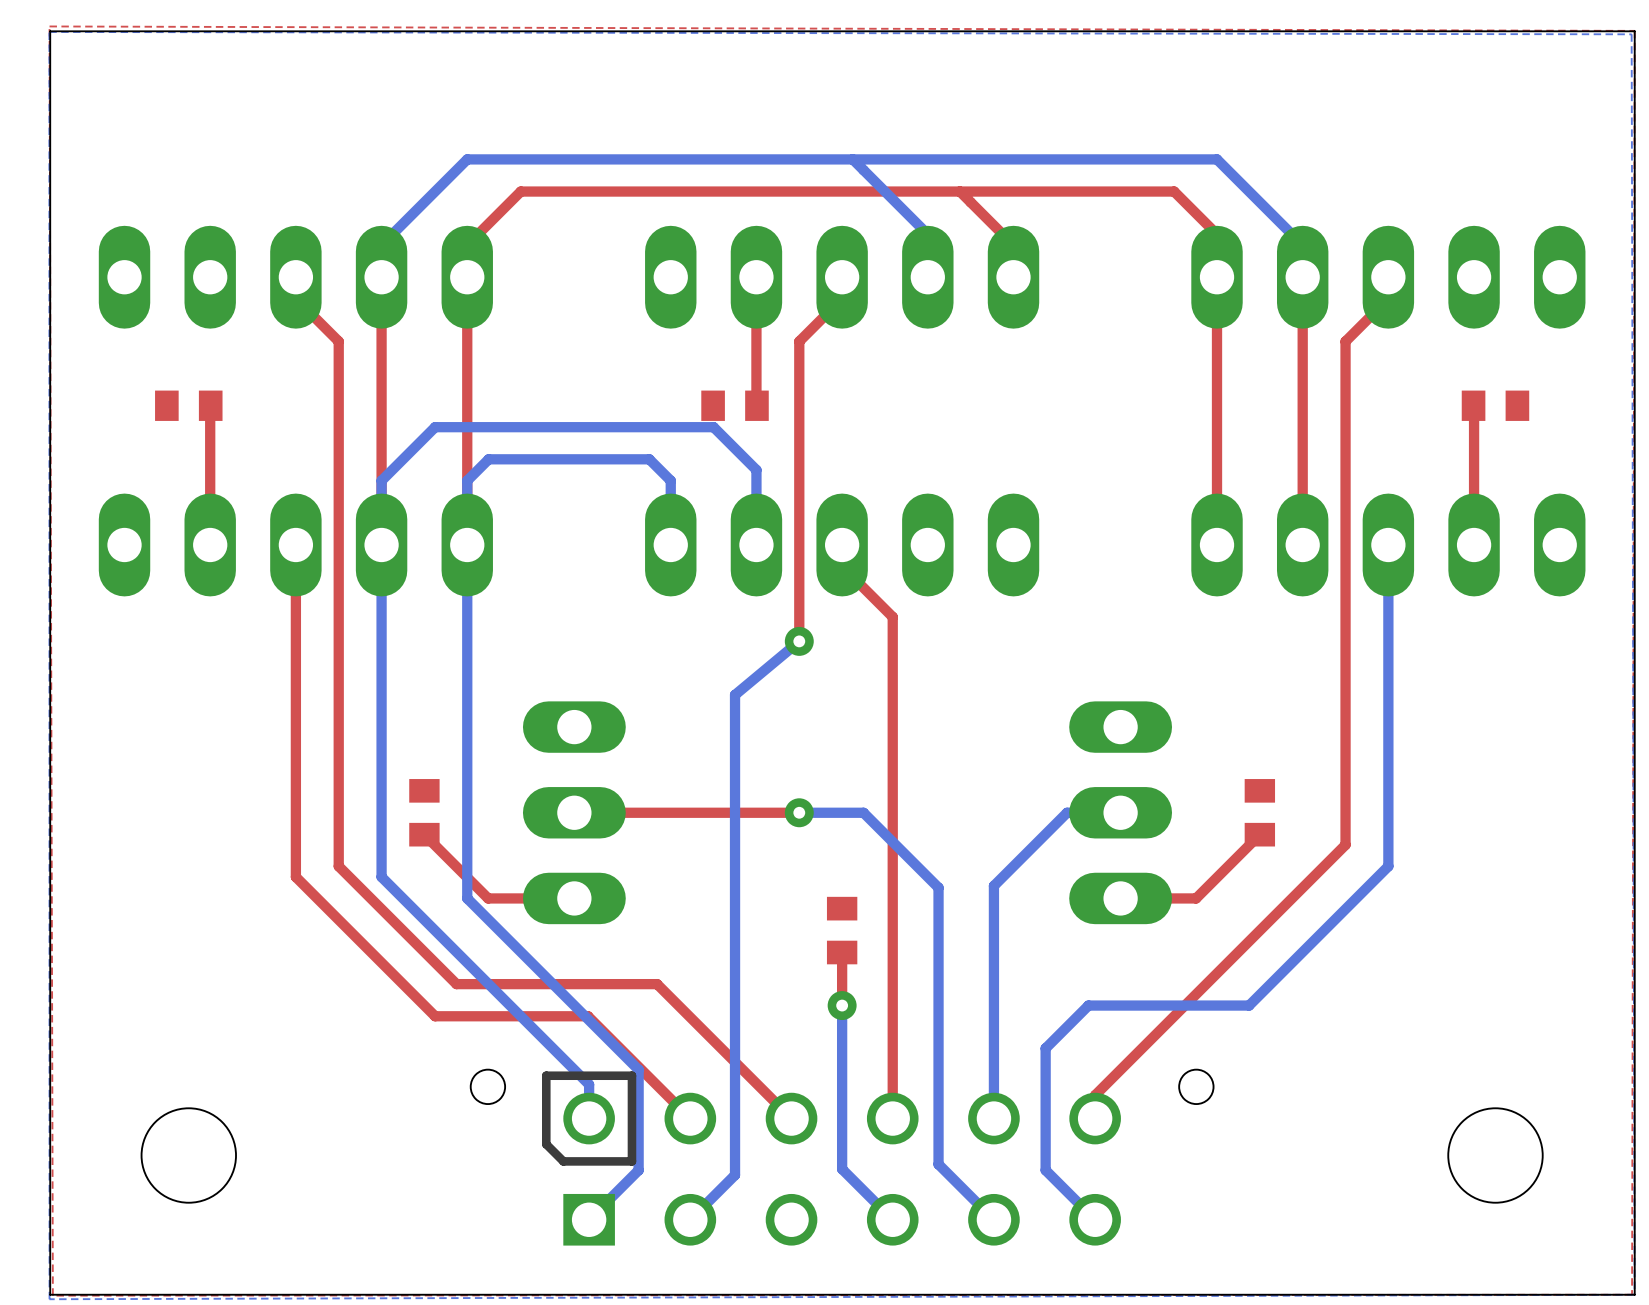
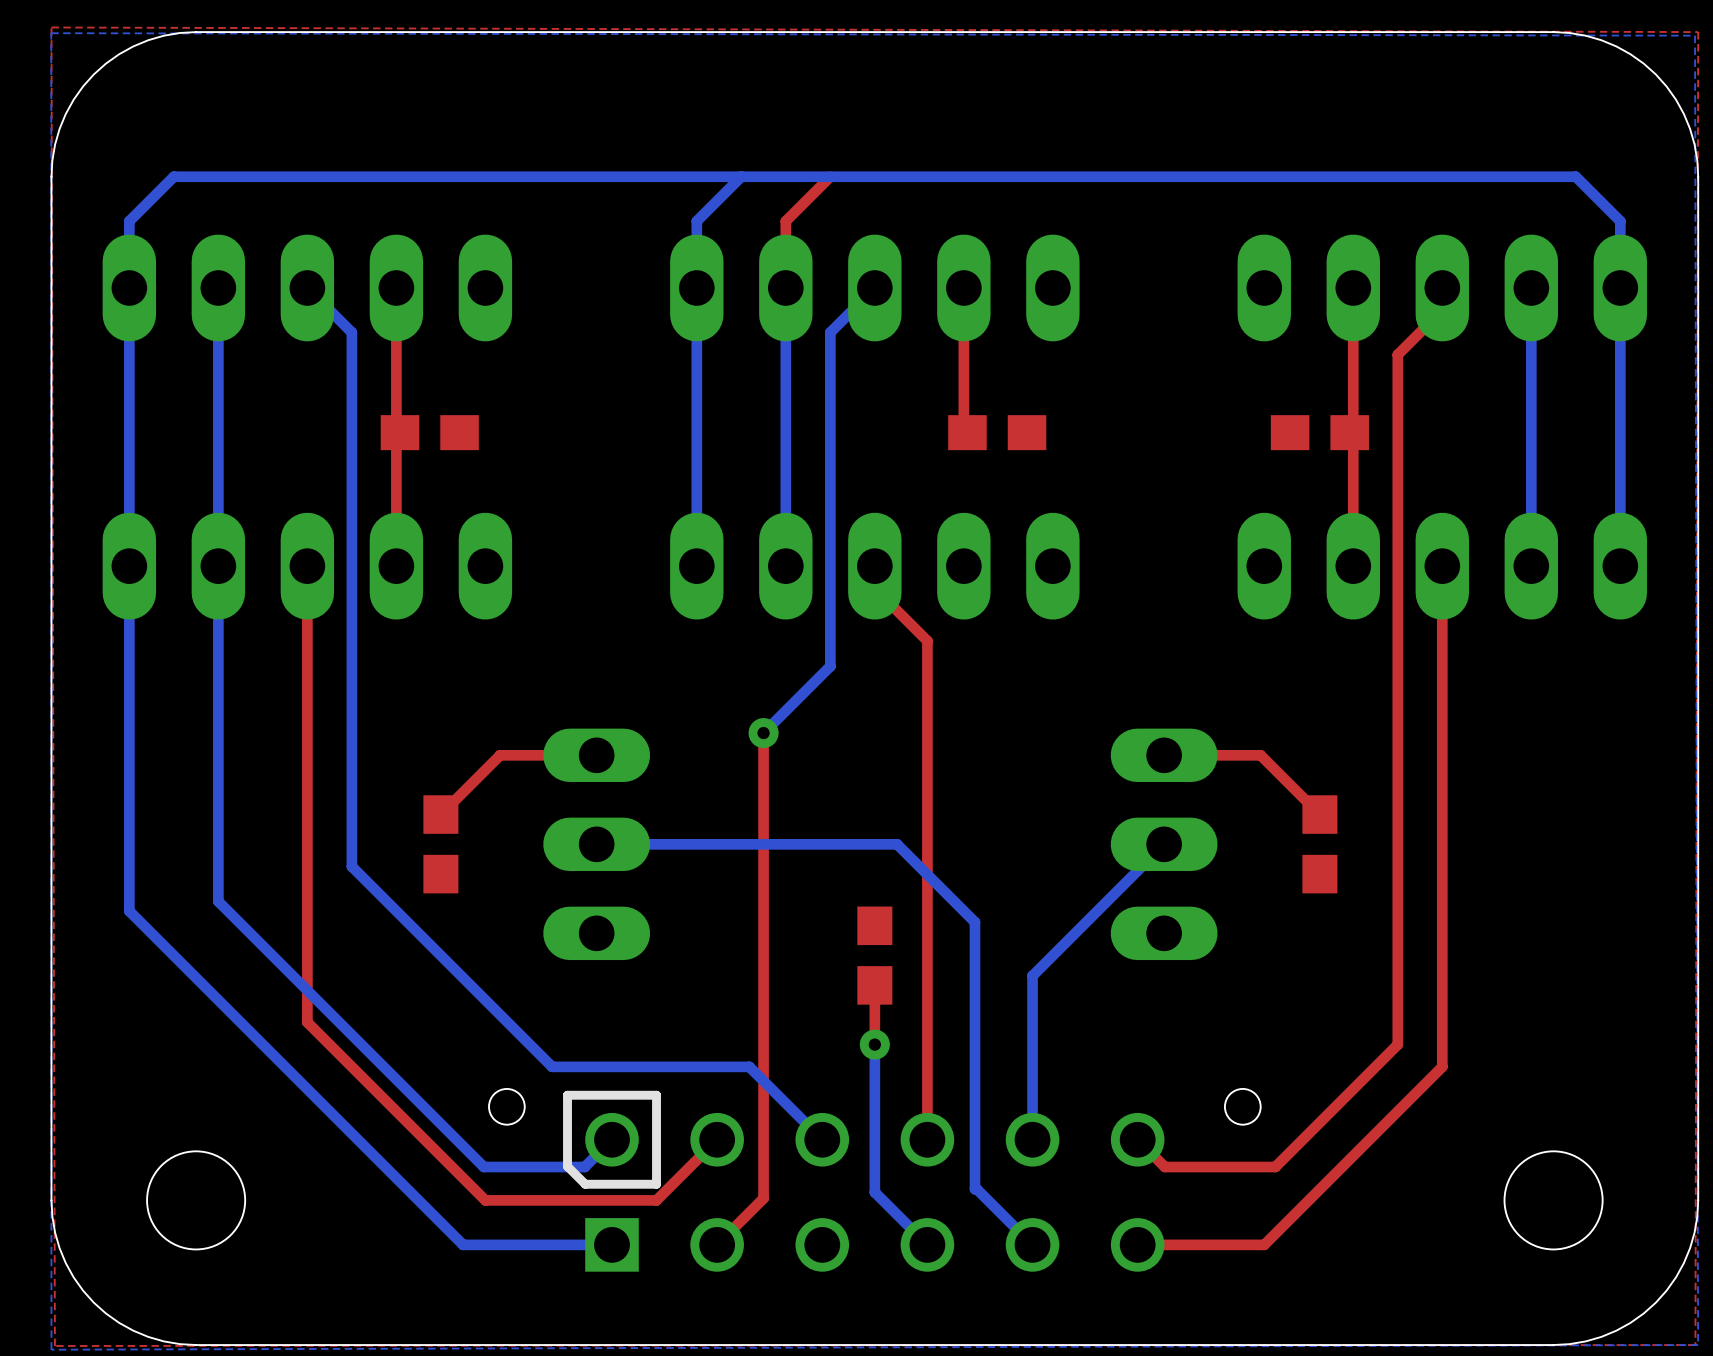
bottom track: (852, 159) (927, 234) (927, 277) -> none
board edge: (1634, 170) (1634, 31) (50, 31) (50, 1294) (188, 1294) -> (1698, 176) (1694, 144) (1690, 128) (1676, 99) (1655, 74) (1630, 54) (1616, 46) (1601, 40) (1569, 32) (196, 32) (163, 35) (148, 40) (119, 54) (105, 63) (83, 86) (65, 113) (55, 144) (51, 176) (52, 1216) (59, 1248) (65, 1263) (73, 1277) (93, 1302) (119, 1322) (148, 1336) (163, 1341) (196, 1345)
top track: (959, 191) (1013, 245) (1013, 277) -> none
bottom track: none -> (218, 287) (218, 901) (483, 1167) (584, 1167) (612, 1139)
top track: (295, 277) (295, 298) (338, 341) (338, 866) (456, 984) (657, 984) (791, 1118) -> none
top track: (756, 277) (756, 405) -> (785, 287) (785, 221) (830, 176)
bottom track: none -> (785, 287) (785, 488)
top track: (842, 277) (842, 298) (799, 341) (799, 641) -> none
bottom track: none -> (874, 287) (830, 332) (830, 666) (763, 733)
top track: none -> (963, 287) (963, 429) (967, 432)
bottom track: (1302, 277) (1302, 245) (1217, 159) (467, 159) (381, 245) (381, 277) -> none
bottom track: none -> (1531, 287) (1531, 566)
part: (188, 405) -> none
top track: (210, 405) (210, 544) -> none
part: (735, 405) -> none
top track: (1473, 405) (1474, 544) -> none
part: (1495, 405) -> none
part: none -> (429, 432)
part: none -> (997, 432)
part: none -> (1319, 432)
bottom track: (756, 470) (713, 427) (435, 427) (381, 480) (381, 877) -> (307, 287) (351, 332) (351, 866) (396, 911)
bottom track: (670, 544) (670, 480) (649, 459) (488, 459) (467, 480) (467, 898) (638, 1069) (638, 1170) (589, 1219) -> (696, 566) (696, 221) (741, 176)
top track: (1217, 544) (1217, 234) (1174, 191) (520, 191) (467, 245) (467, 544) -> none
top track: none -> (1442, 566) (1442, 1066) (1264, 1244) (1137, 1244)
bottom track: (1388, 544) (1388, 866) (1249, 1005) (1088, 1005) (1045, 1048) (1045, 1170) (1095, 1219) -> none
bottom track: none -> (1620, 566) (1620, 221) (1575, 176) (173, 176) (129, 221) (129, 911) (463, 1244) (612, 1244)
bottom track: (799, 641) (735, 694) (735, 1175) (690, 1219) -> none
via: (799, 641) -> none
top track: none -> (763, 733) (763, 1198) (717, 1244)
via: none -> (763, 733)
top track: none -> (596, 755) (500, 755) (440, 814)
top track: none -> (1164, 755) (1260, 755) (1319, 814)
part footprint: [409, 779, 440, 847] -> [423, 795, 459, 894]
part footprint: [1244, 779, 1276, 847] -> [1302, 795, 1338, 894]
top track: (799, 812) (574, 812) -> none
bottom track: none -> (830, 844) (596, 844)
via: (799, 812) -> none
bottom track: (1120, 812) (1067, 812) (993, 885) (993, 939) -> (1164, 844) (1032, 975)
top track: (424, 834) (488, 898) (574, 898) -> none
top track: (1259, 834) (1196, 898) (1120, 898) -> none
top track: (1345, 844) (1095, 1095) (1095, 1118) -> (1397, 877) (1397, 1044) (1275, 1167) (1164, 1167) (1137, 1139)
top track: (295, 877) (435, 1016) (588, 1016) (690, 1118) -> (307, 911) (307, 1022) (485, 1200) (656, 1200) (717, 1139)
part footprint: [826, 896, 858, 965] -> [857, 906, 893, 1005]
bottom track: (531, 1026) (589, 1084) (589, 1118) -> (552, 1066) (749, 1066) (822, 1139)
bottom track: (938, 1144) (938, 1164) (993, 1219) -> (974, 1189) (1032, 1244)
bottom track: (842, 1147) (842, 1169) (892, 1219) -> (874, 1192) (927, 1244)
board edge: (1634, 1155) (1634, 1294) (1495, 1294) -> (1698, 1200) (1694, 1232) (1690, 1248) (1676, 1277) (1655, 1302) (1630, 1322) (1601, 1336) (1585, 1341) (1553, 1345)
part position: (842, 1157) -> (874, 1180)

